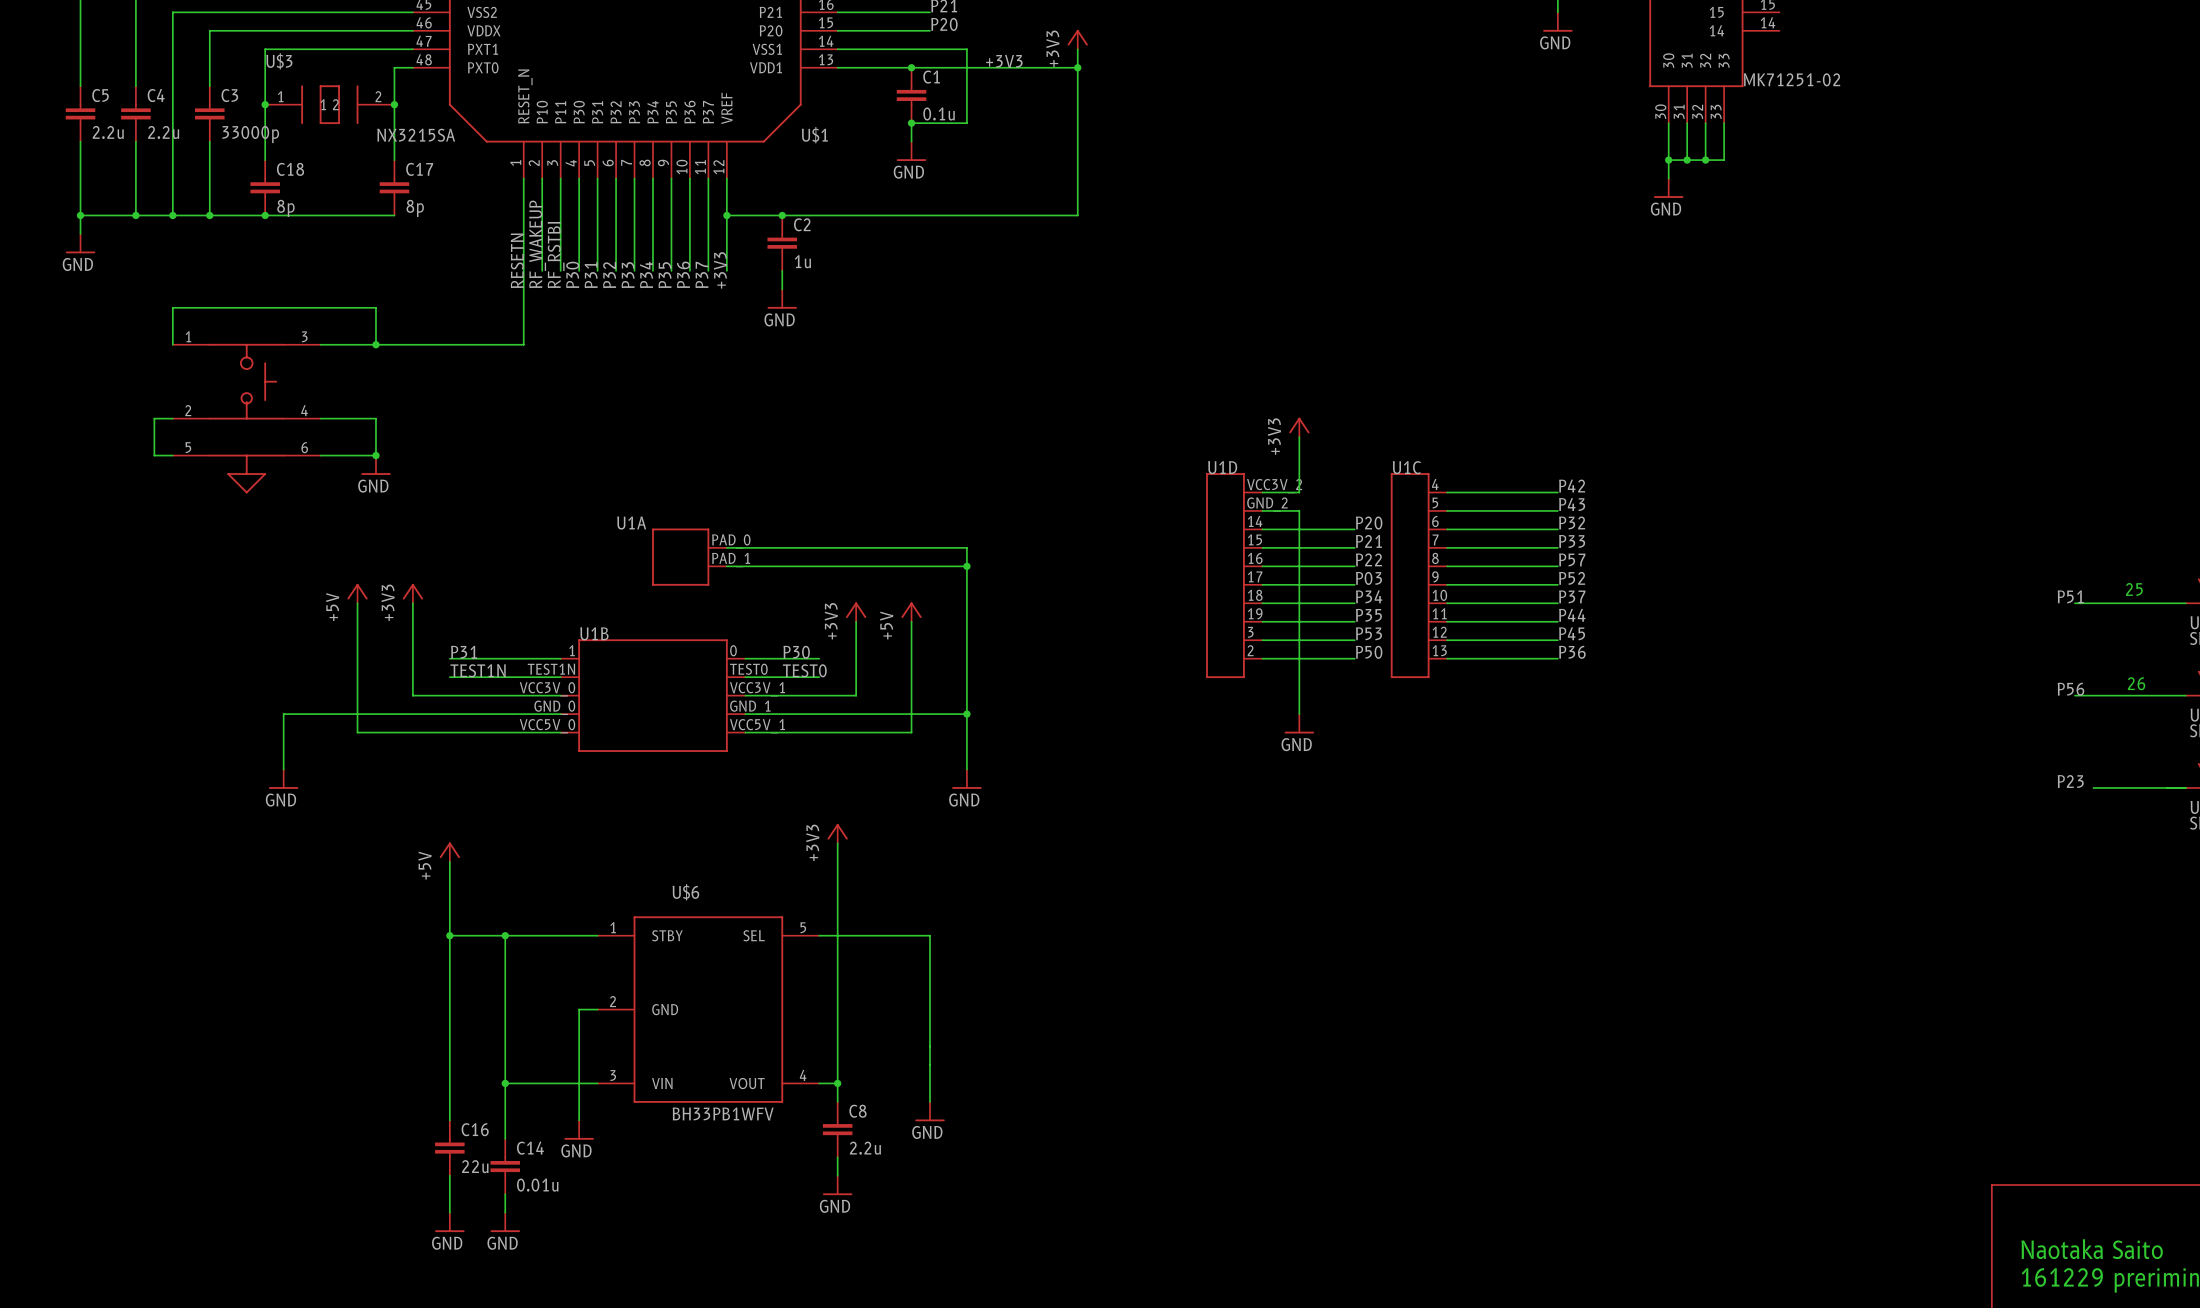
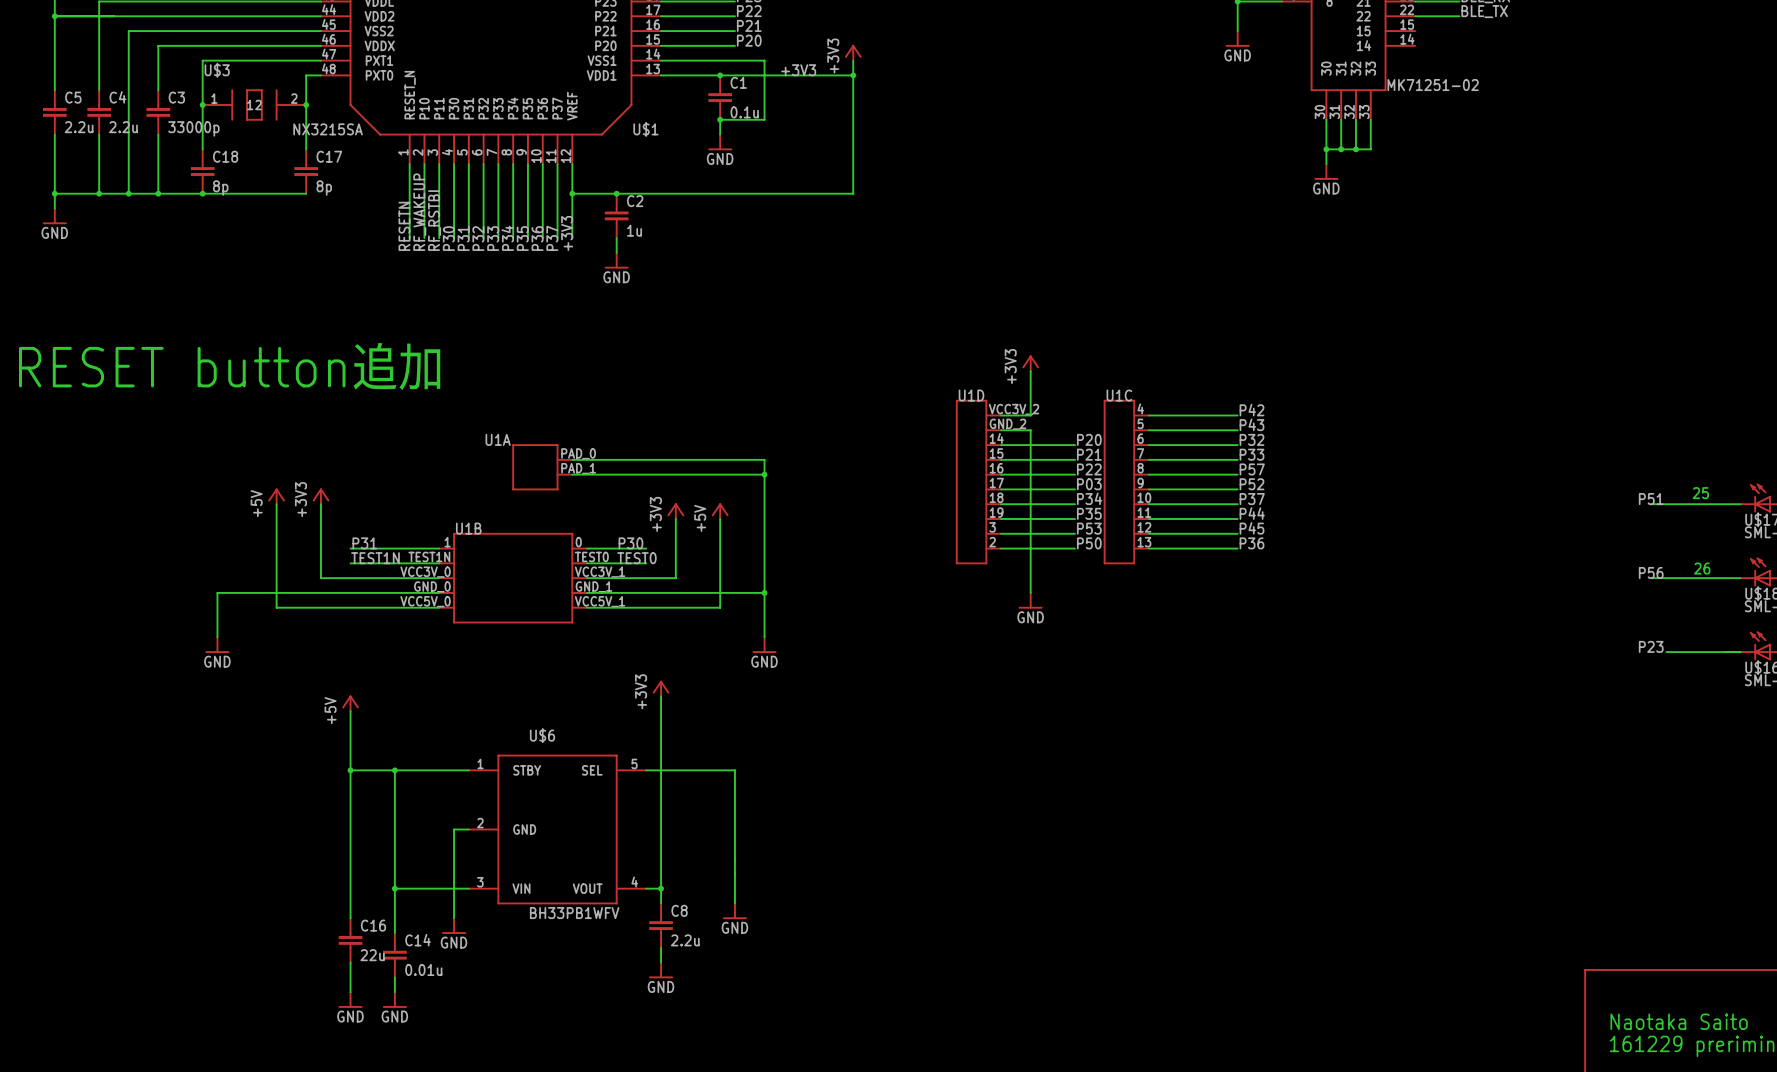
wire: (523, 270) (523, 344) (320, 344) -> none
wire: (172, 344) (172, 307) (375, 307) (375, 344) -> none
junction: (375, 344) -> none
wire: (172, 418) (154, 418) (154, 455) (172, 455) -> none
part: (246, 418) -> none
wire: (320, 418) (375, 418) (375, 455) (320, 455) -> none
text: none -> RESET button追加 (230, 366)
junction: (375, 455) -> none
power symbol: GND (375, 465) -> none

